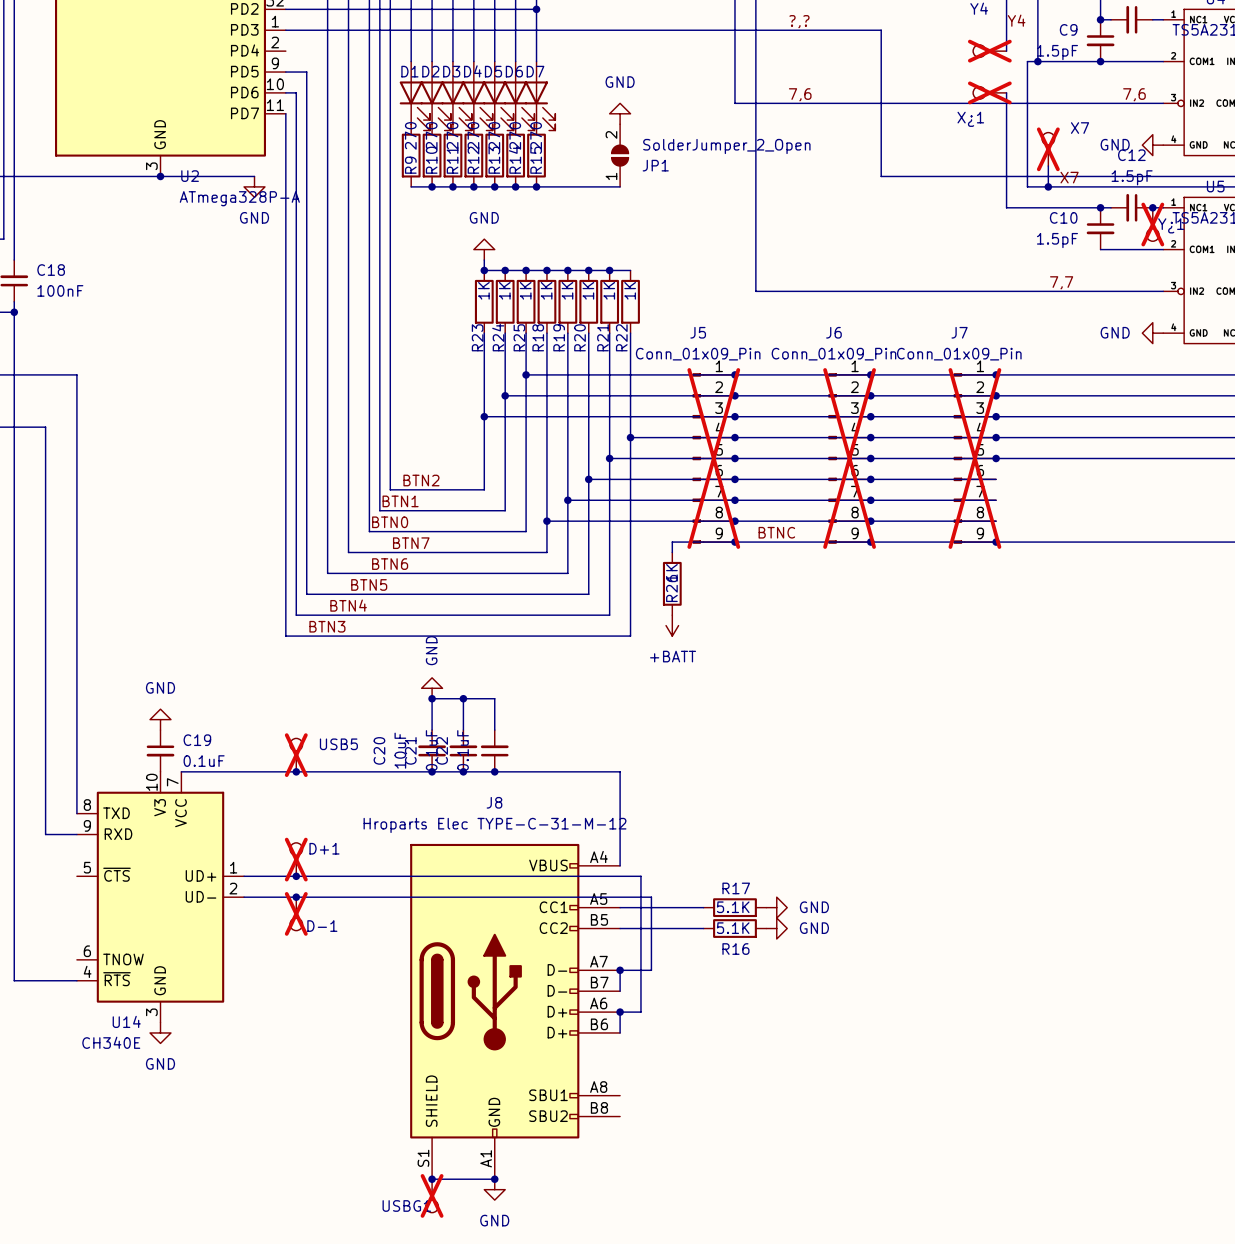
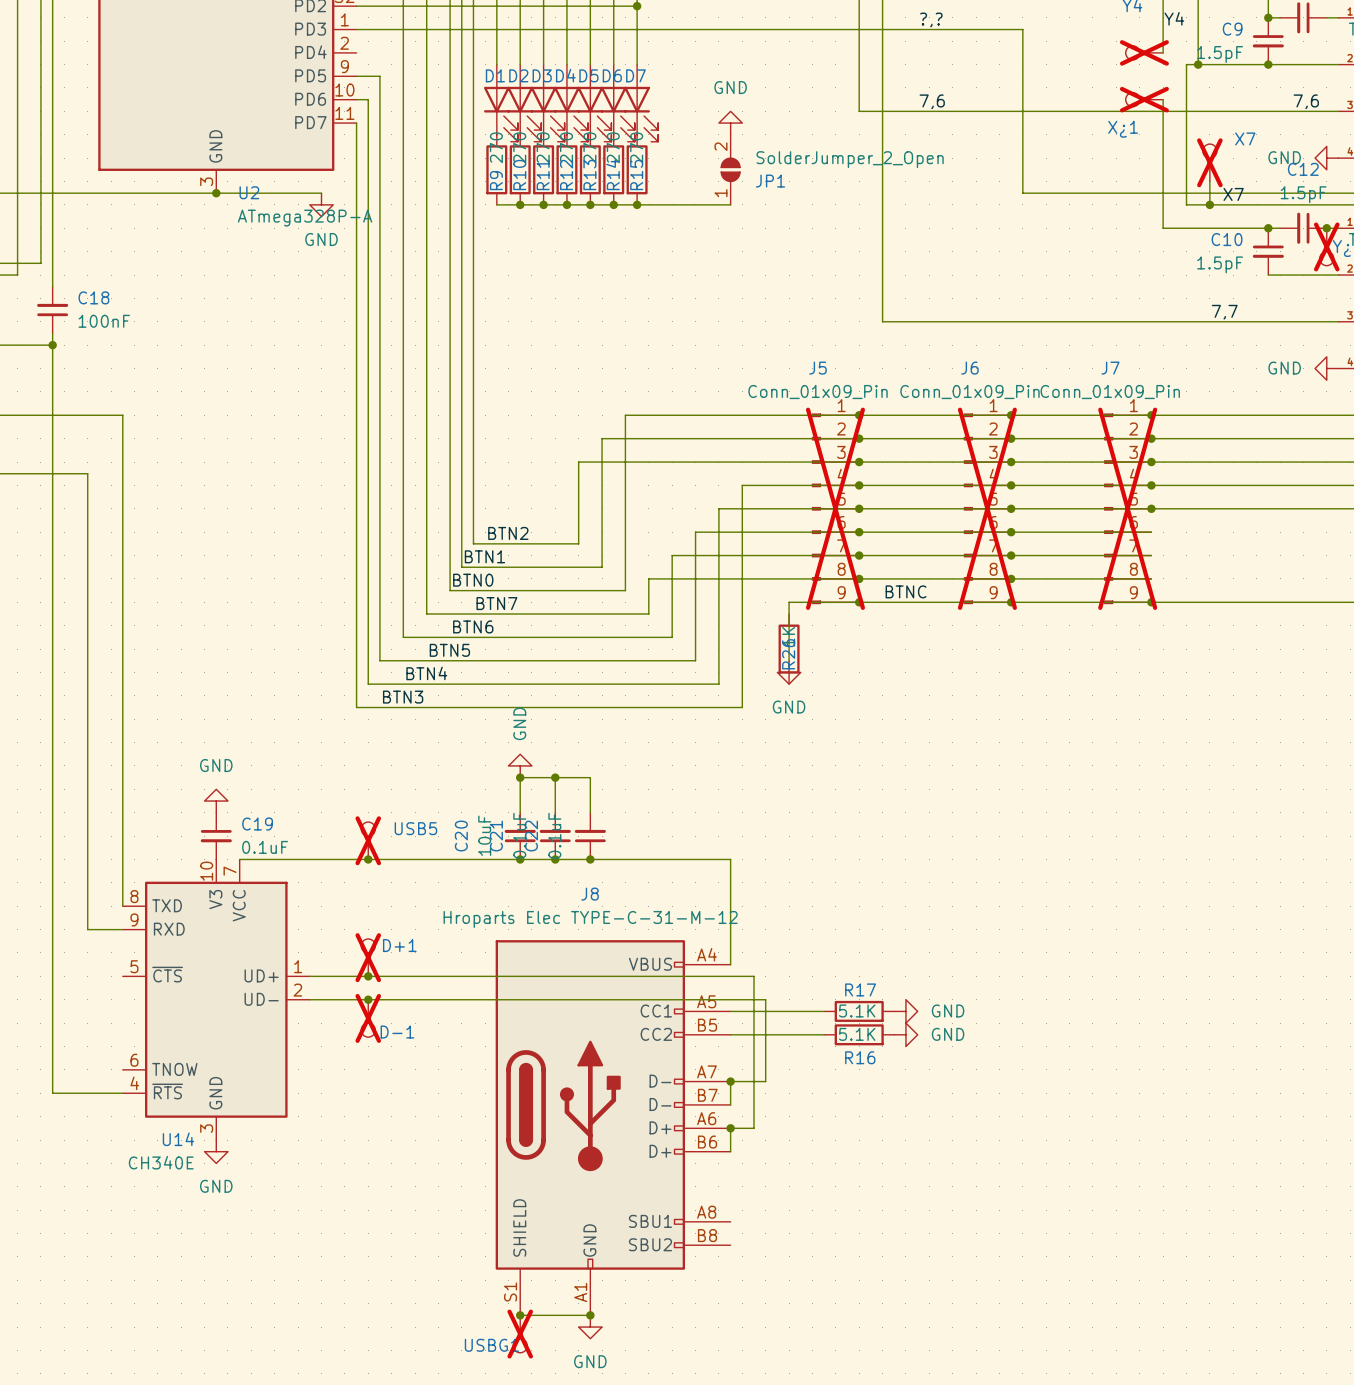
power symbol: GND (484, 249) -> none
wire: (484, 260) (484, 270) (630, 270) -> none
junction: (484, 270) -> none
junction: (505, 270) -> none
junction: (526, 270) -> none
junction: (546, 270) -> none
junction: (567, 270) -> none
junction: (588, 270) -> none
junction: (609, 270) -> none
R23: 1K (484, 301) -> none
R24: 1K (505, 301) -> none
R25: 1K (526, 301) -> none
R18: 1K (546, 301) -> none
R19: 1K (567, 301) -> none
R20: 1K (588, 301) -> none
R21: 1K (609, 301) -> none
R22: 1K (630, 301) -> none
wire: (484, 333) (484, 416) -> none
wire: (505, 333) (505, 395) -> none
wire: (526, 333) (526, 374) -> none
wire: (546, 333) (546, 521) -> none
wire: (567, 333) (567, 500) -> none
wire: (588, 333) (588, 479) -> none
wire: (609, 333) (609, 458) -> none
wire: (630, 333) (630, 437) -> none
junction: (526, 374) -> none
junction: (505, 395) -> none
junction: (484, 416) -> none
junction: (630, 437) -> none
junction: (609, 458) -> none
junction: (588, 479) -> none
junction: (567, 500) -> none
junction: (546, 521) -> none
wire: none -> (789, 614) (789, 660)
power symbol: none -> GND (789, 672)
power symbol: +BATT (672, 625) -> none

